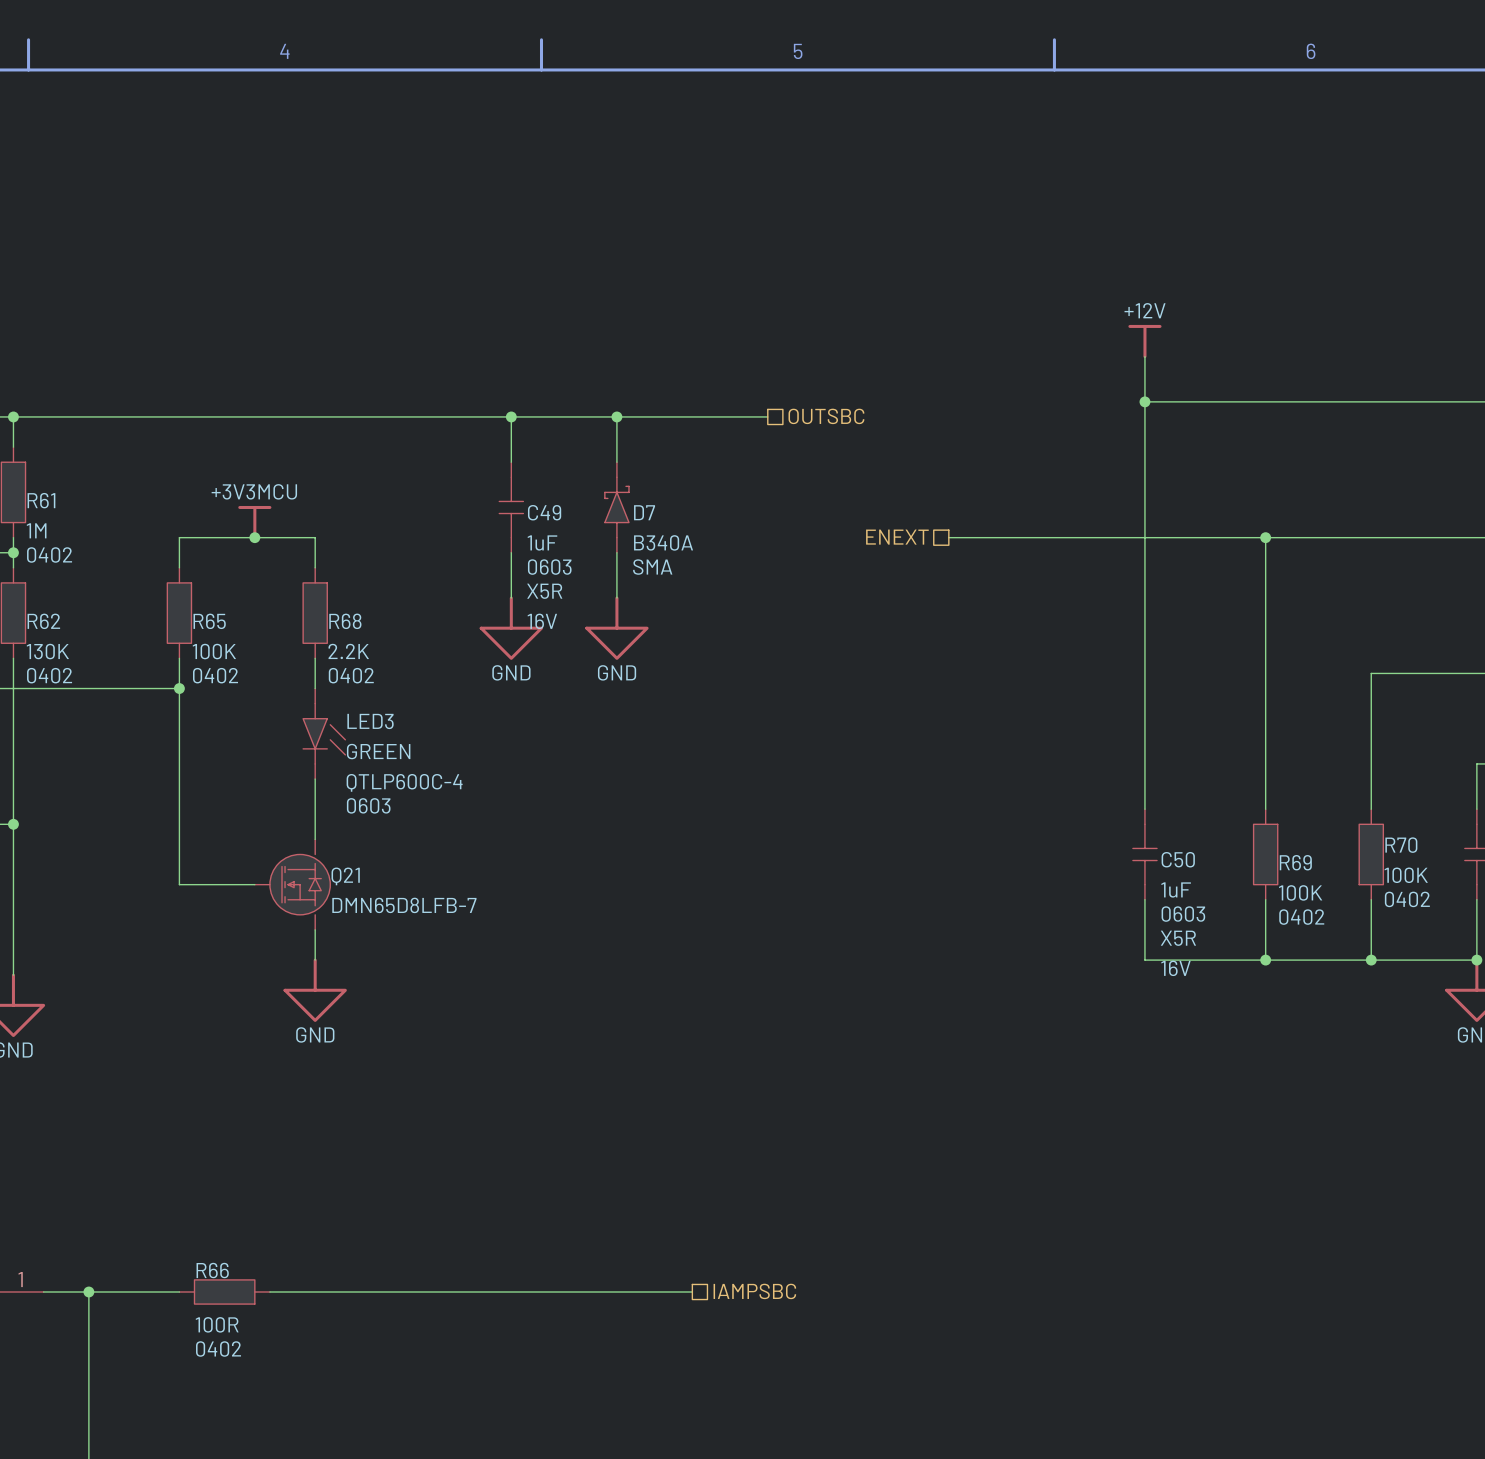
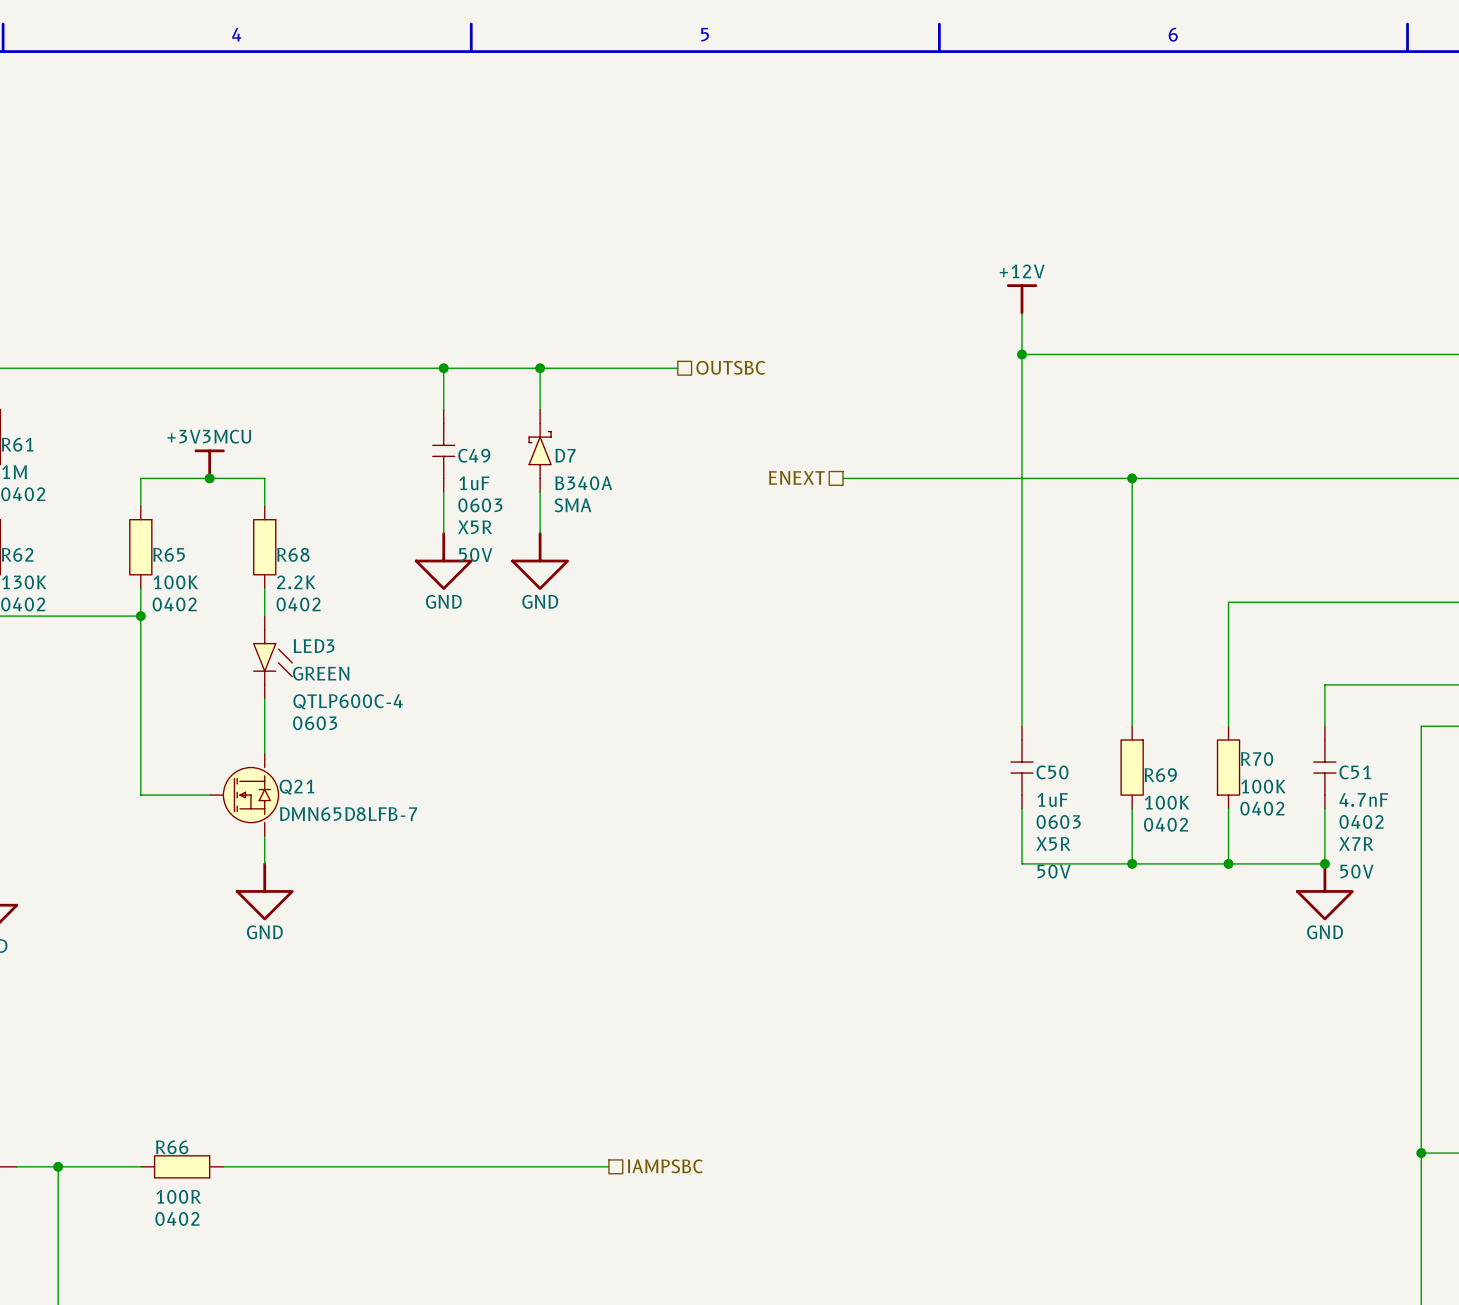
C49 text: 16V (542, 621) -> 50V (475, 554)
C50 text: 16V (1175, 968) -> 50V (1054, 871)

